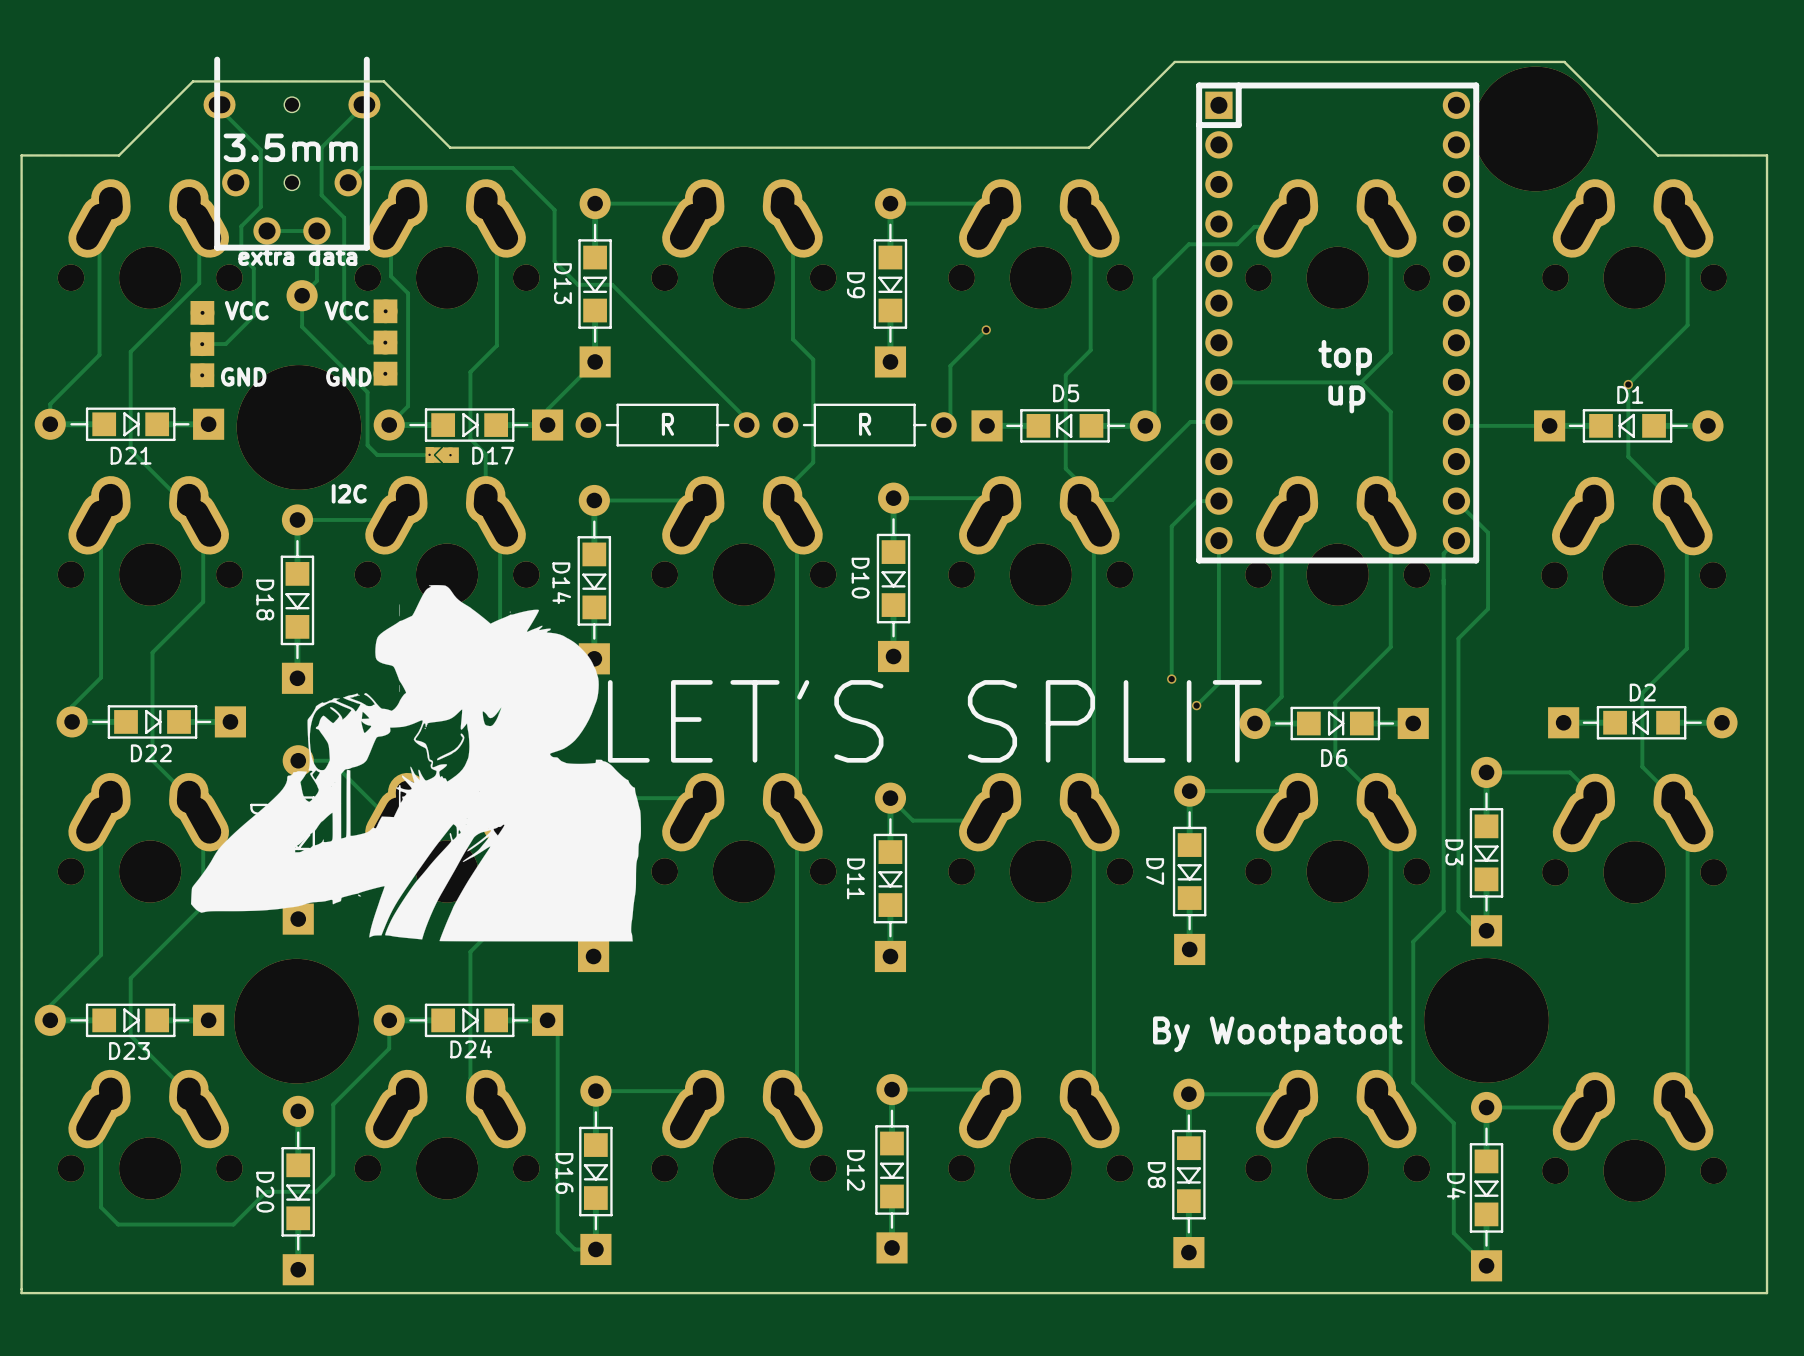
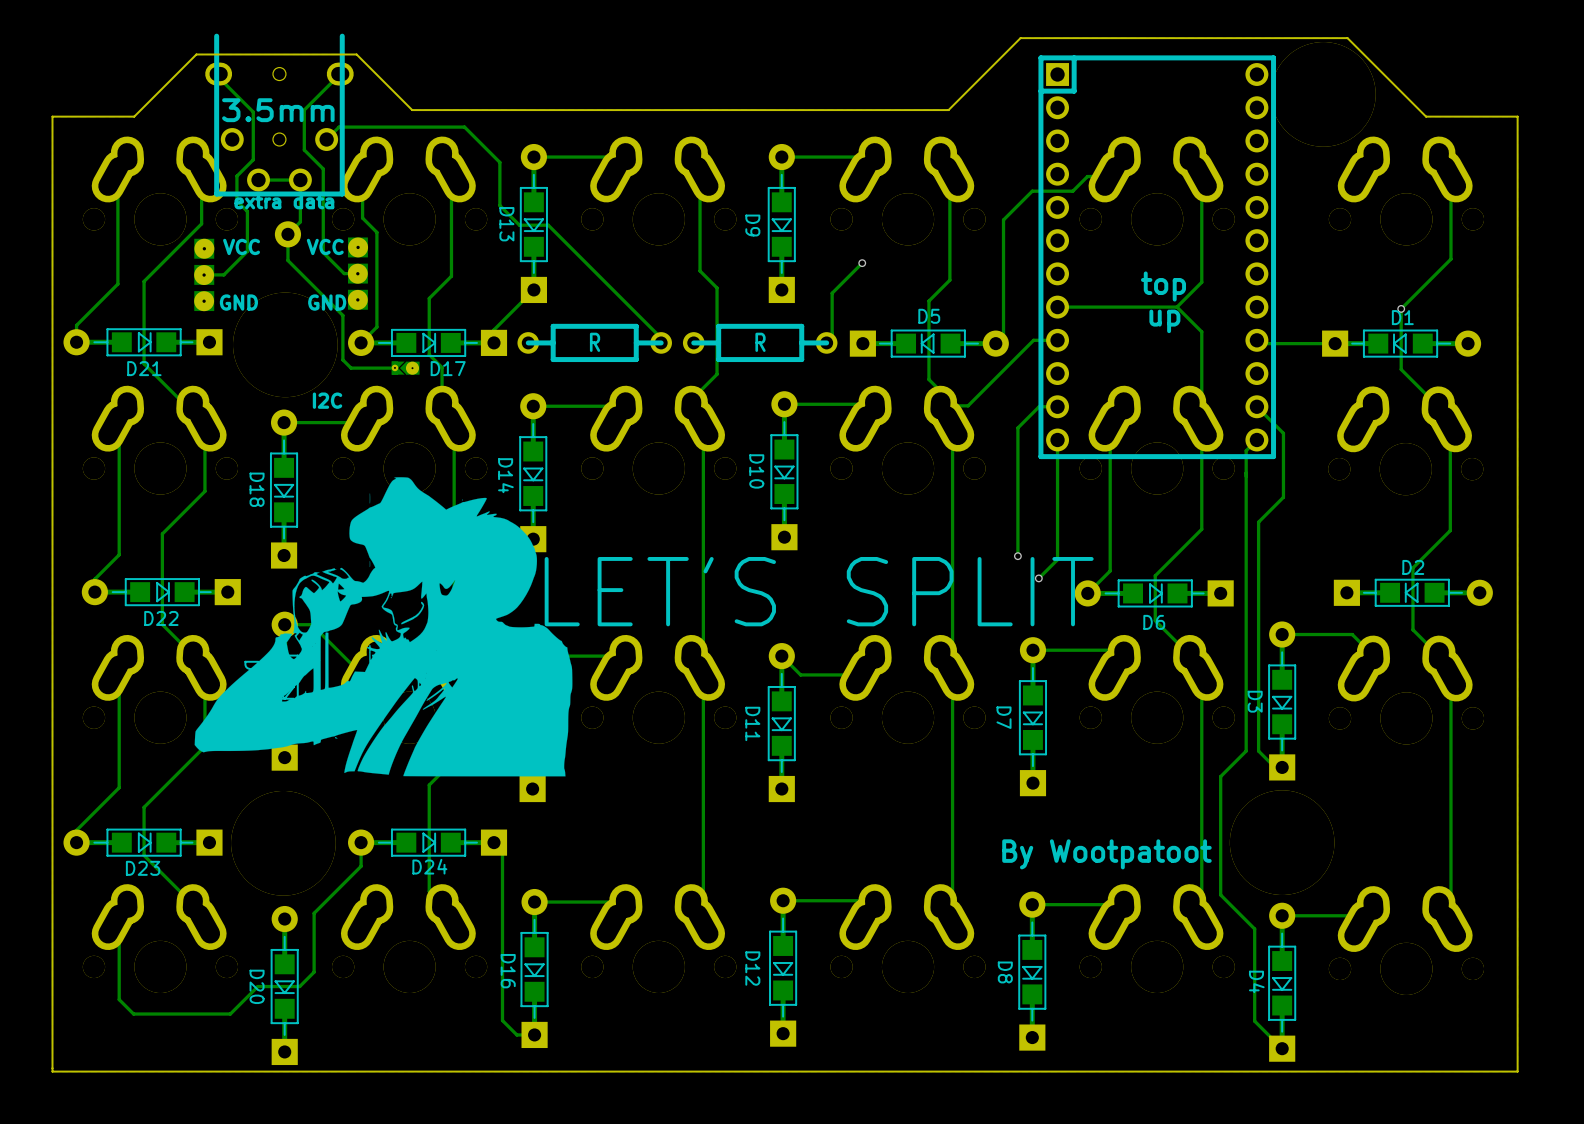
part footprint: [575, 403, 760, 447] -> [517, 323, 672, 363]
part footprint: [772, 403, 957, 447] -> [682, 323, 838, 363]

